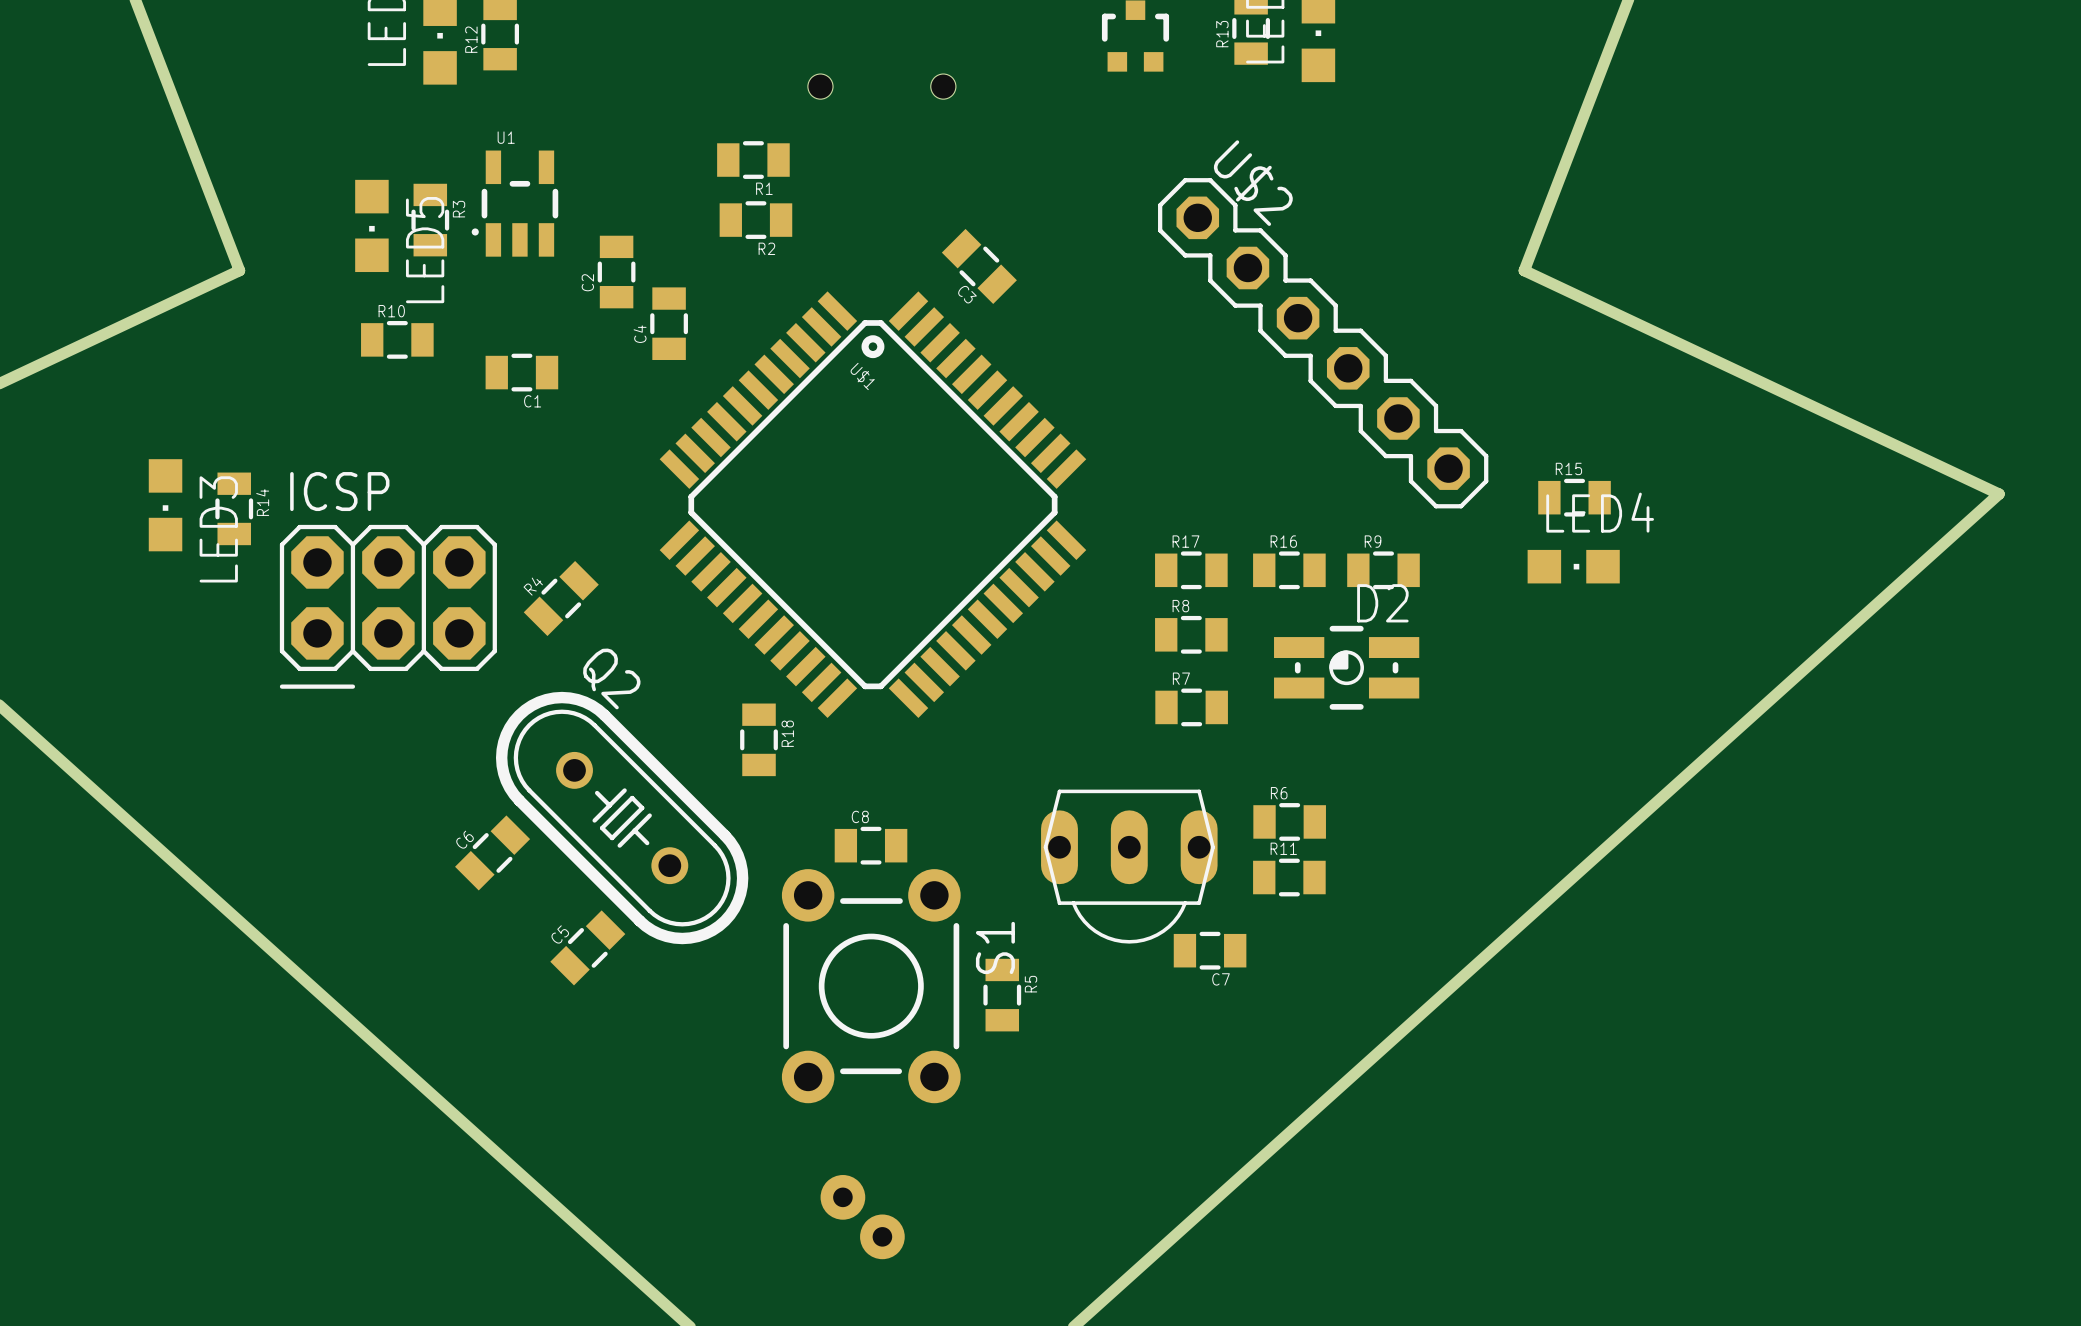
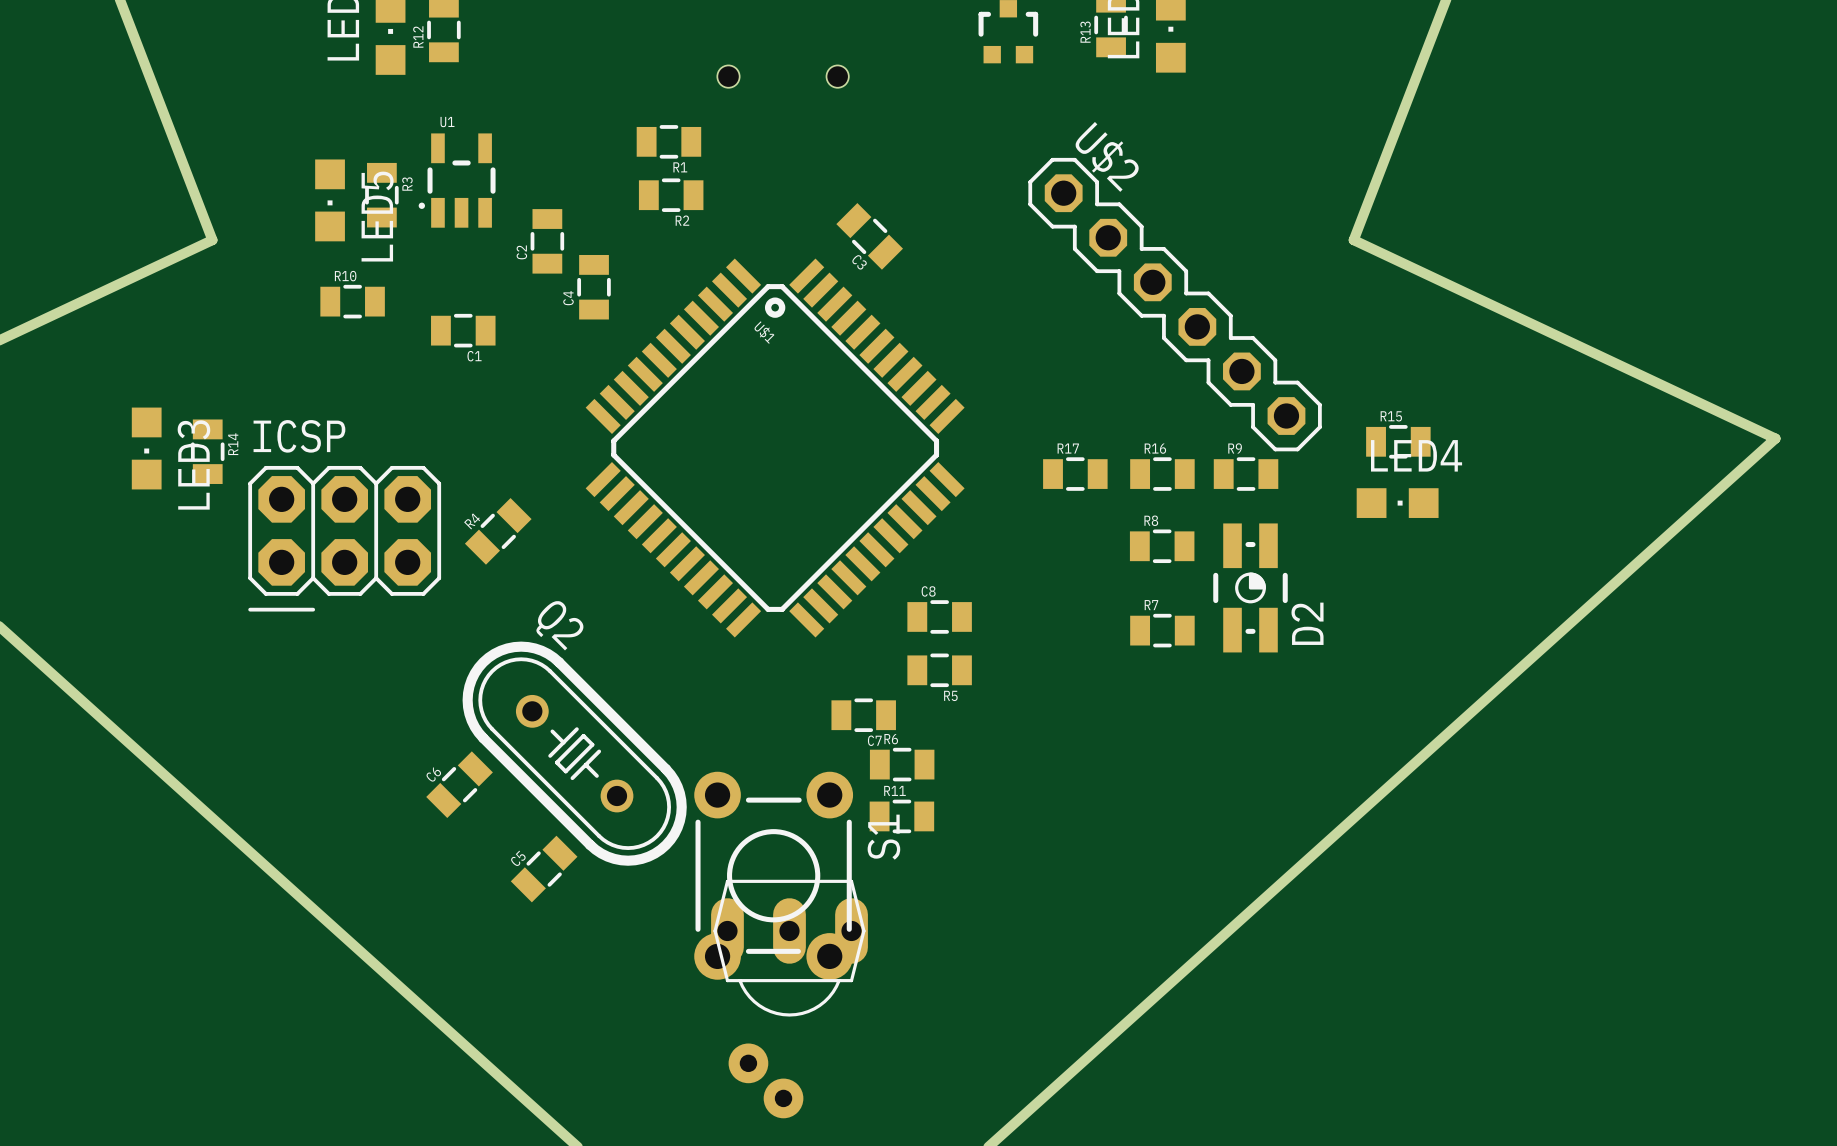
R17 position: (1191, 570) -> (1075, 474)
R16 position: (1289, 570) -> (1162, 474)
R9 position: (1383, 570) -> (1246, 474)
R8 position: (1191, 634) -> (1162, 546)
D2 rotation: 0° (1346, 667) -> 90° clockwise (1250, 587)
R7 position: (1191, 707) -> (1162, 630)
R18: (759, 739) -> none
Q2 position: (622, 818) -> (574, 753)
R6 position: (1289, 821) -> (902, 764)
C8 position: (871, 845) -> (939, 616)
C6 position: (492, 852) -> (459, 784)
part position: (1129, 866) -> (789, 948)
R11 position: (1289, 877) -> (901, 816)
C5 position: (587, 947) -> (544, 869)
C7 position: (1210, 950) -> (863, 715)
R5 rotation: 0° (1002, 995) -> 90° clockwise (939, 670)
R5 position: (1002, 995) -> (939, 670)

